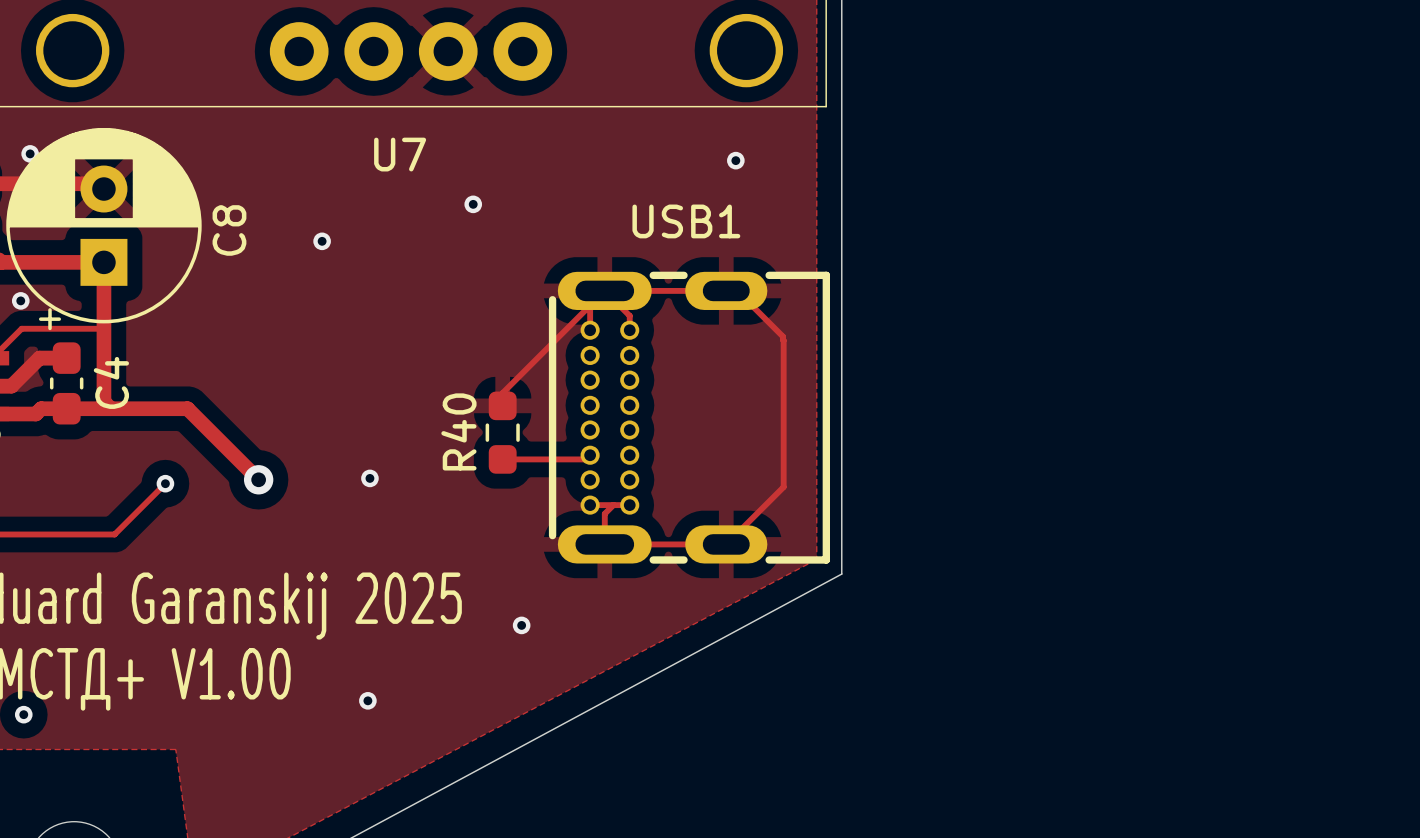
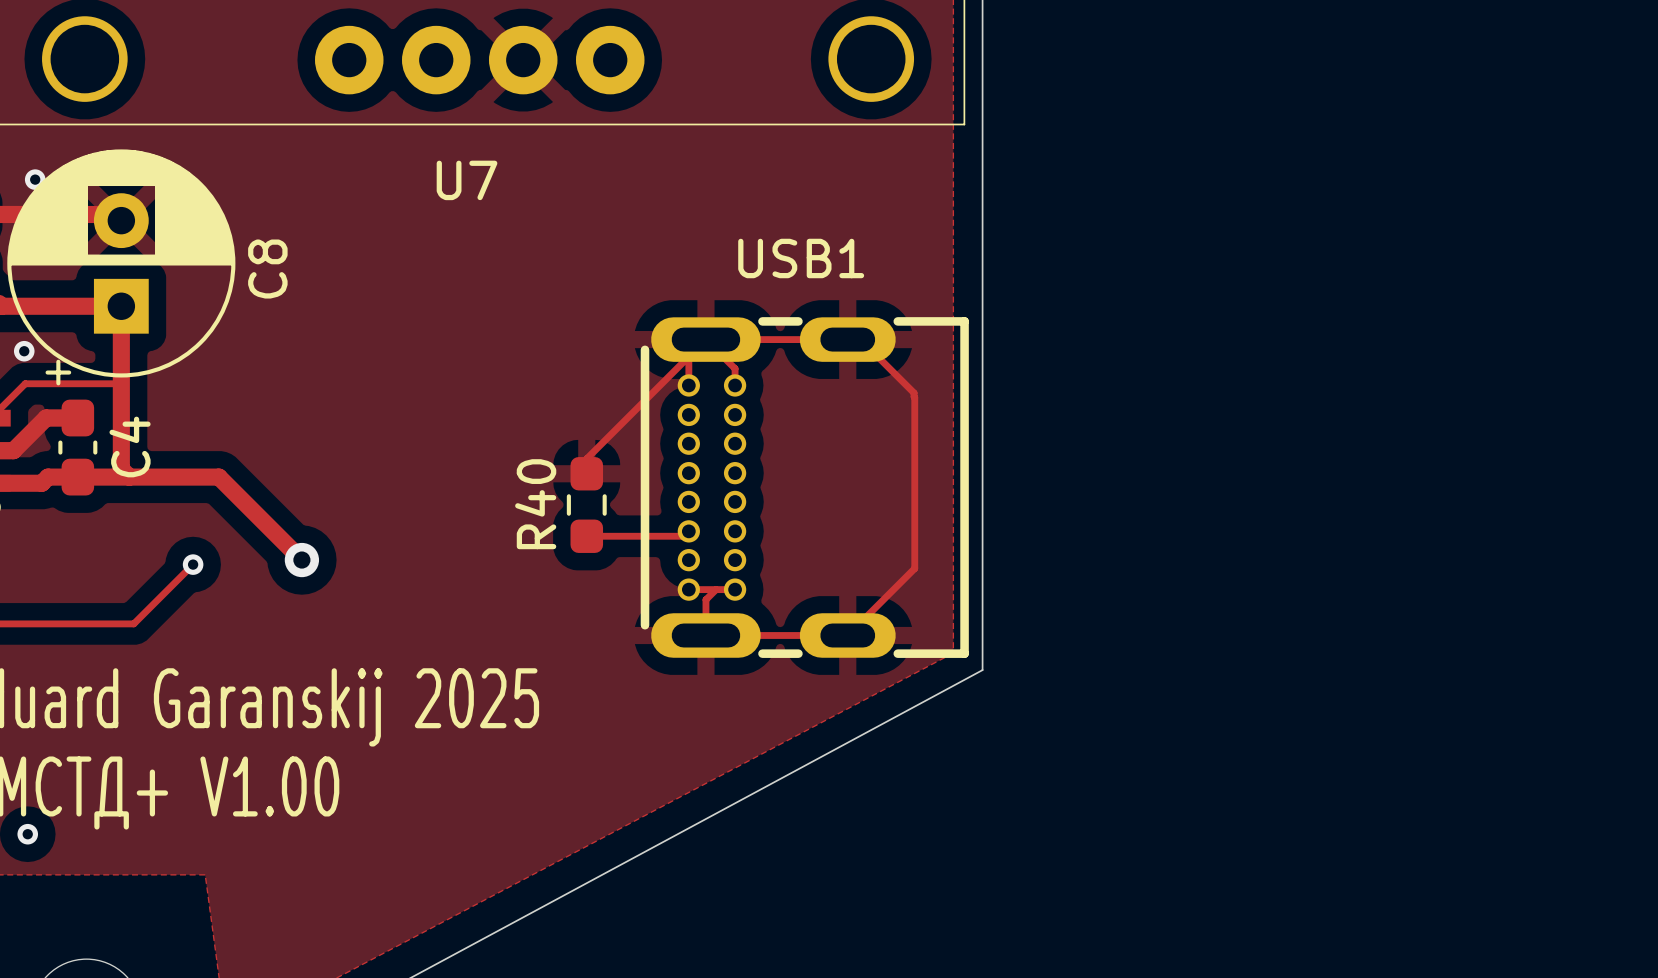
via: (735, 160) -> none
via: (473, 204) -> none
via: (322, 241) -> none
via: (369, 478) -> none
via: (521, 625) -> none
via: (367, 700) -> none

